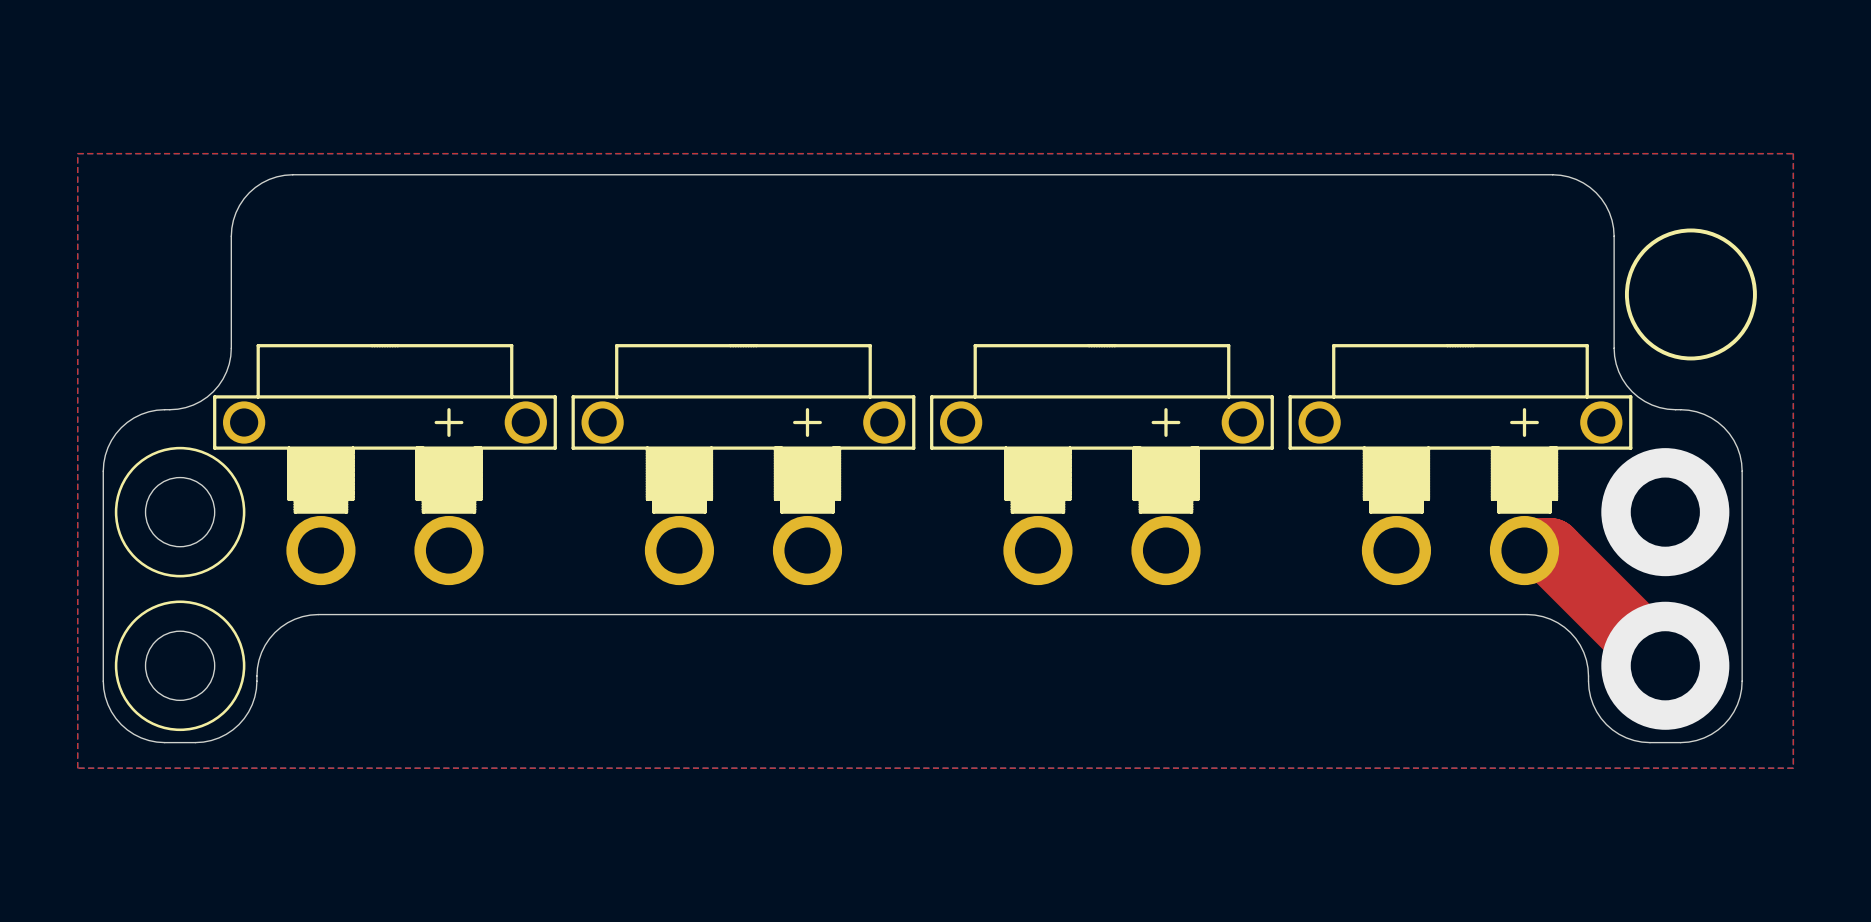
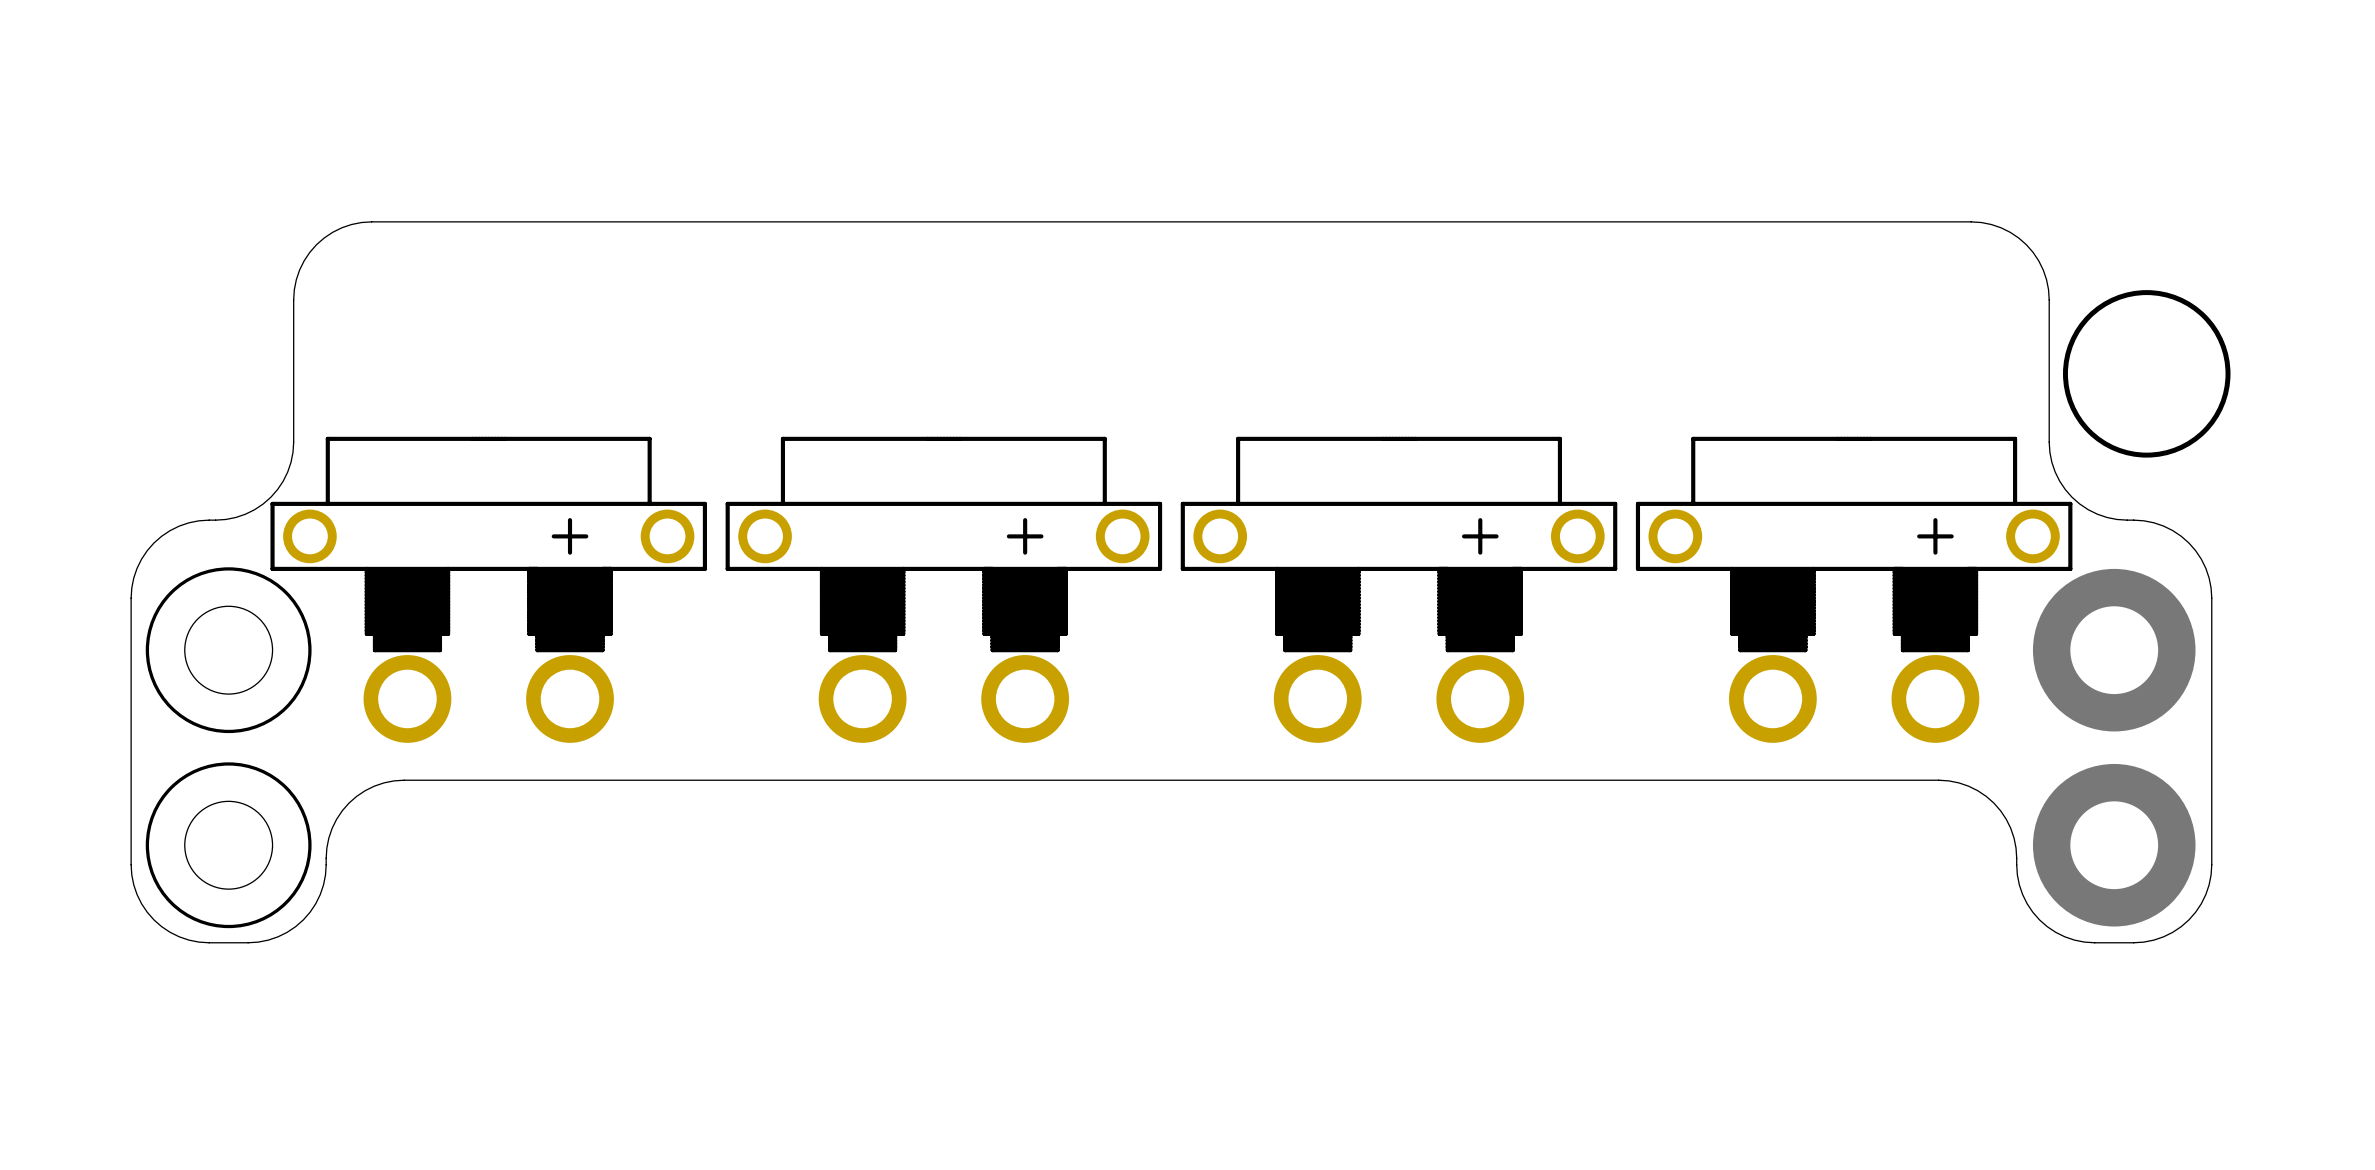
top zone outline: (77, 153) (77, 768) (1793, 768) (1793, 153) (77, 153) -> none
top track: (1524, 550) (1550, 550) (1665, 665) -> none

